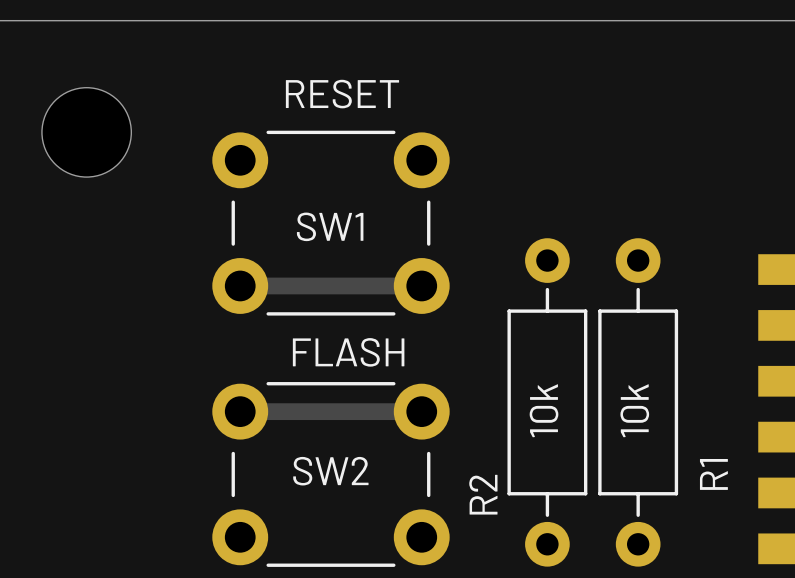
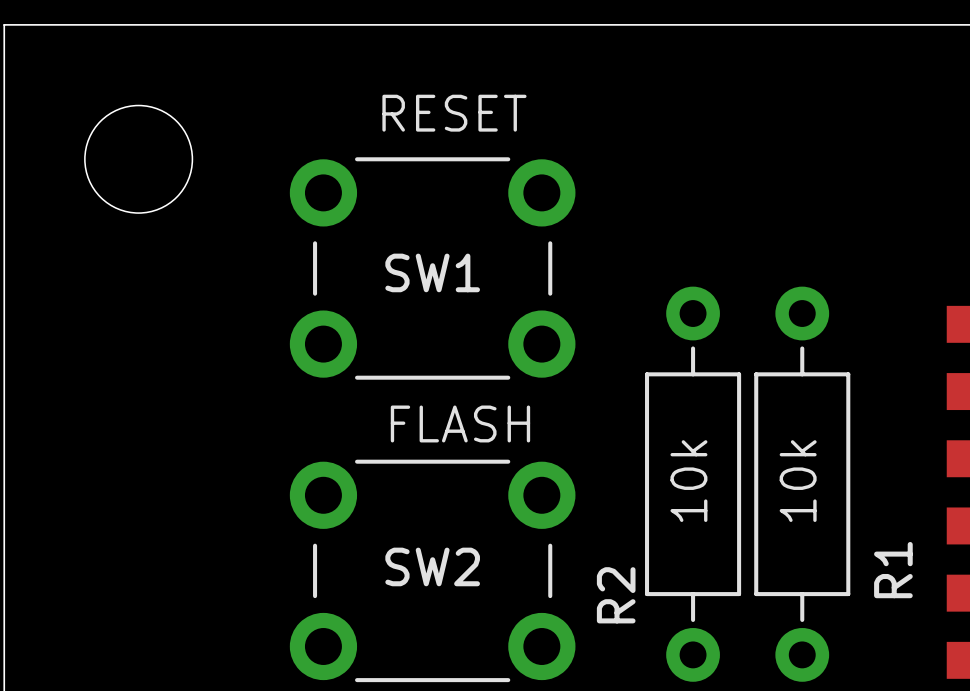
track: (240, 285) (421, 285) -> none
track: (240, 411) (421, 411) -> none

